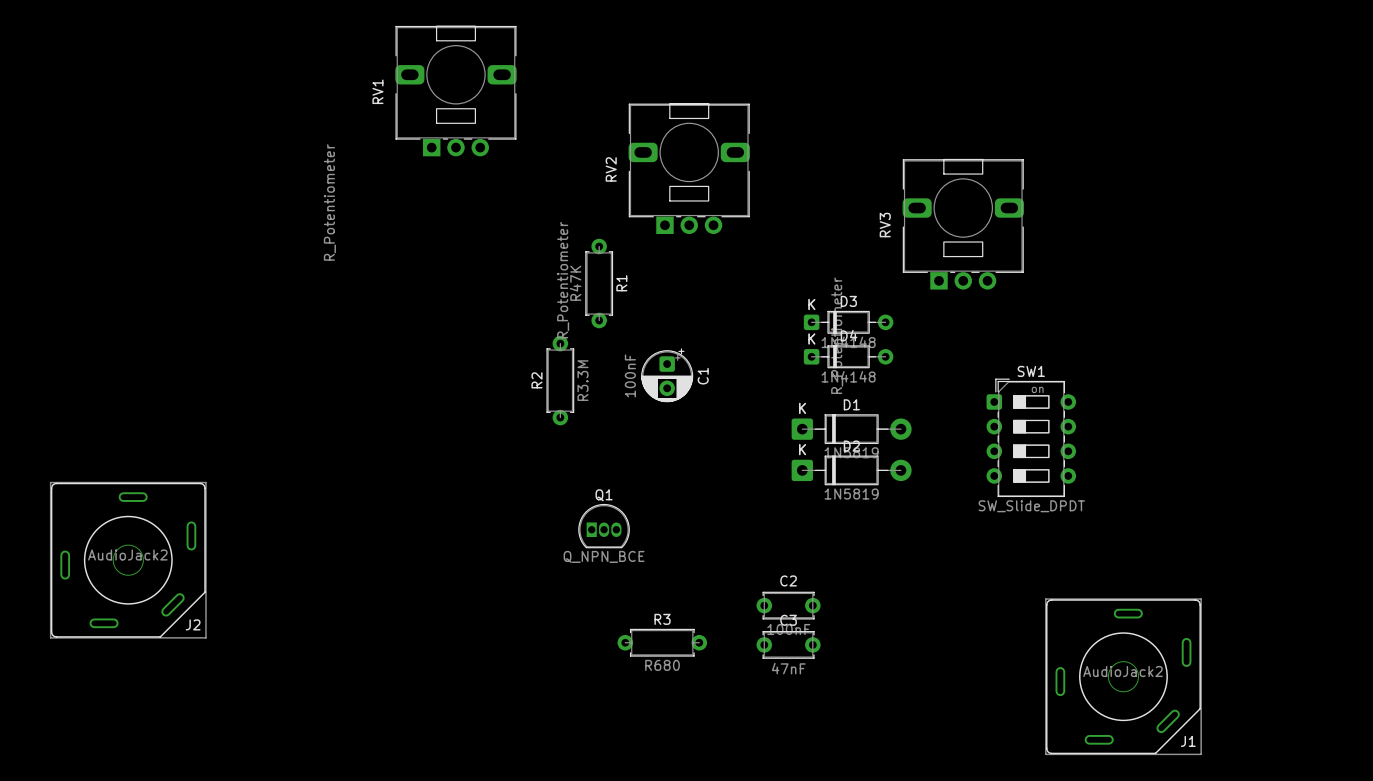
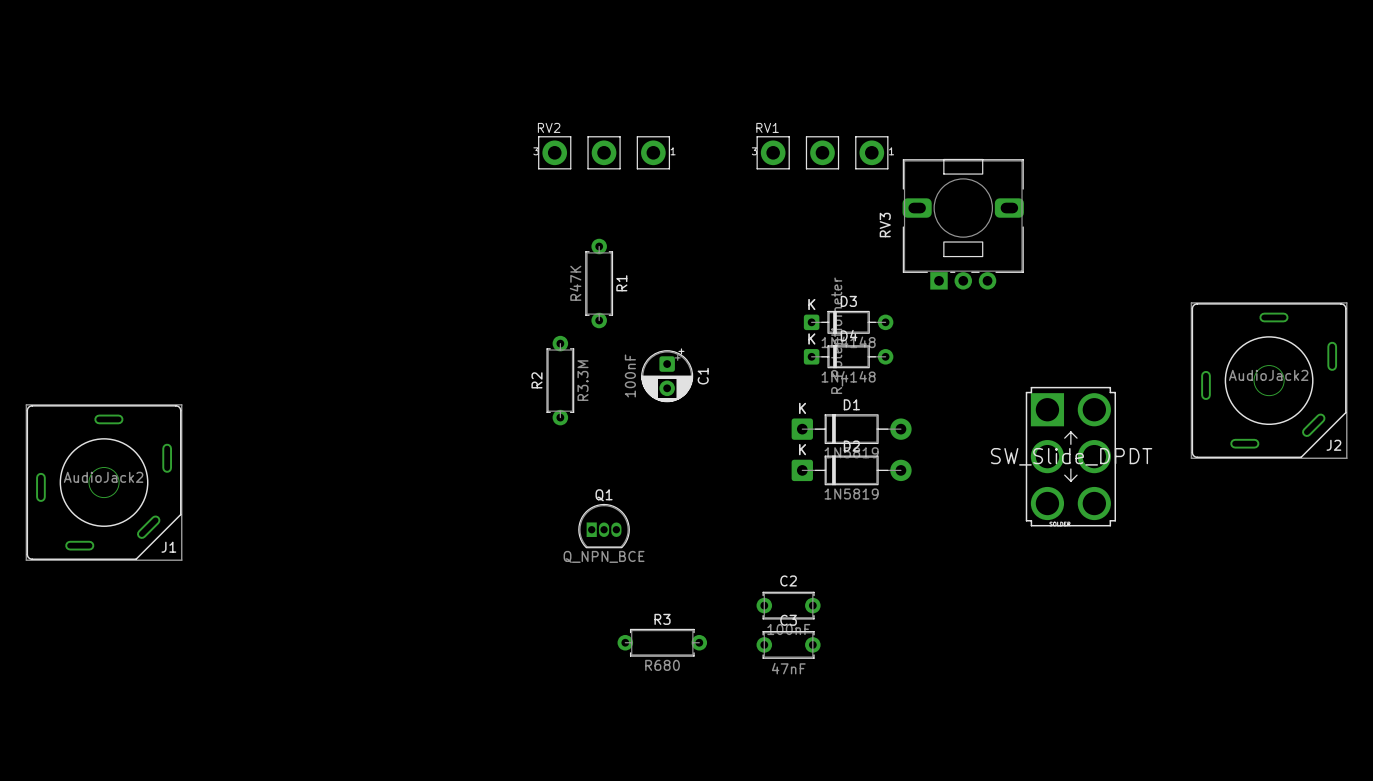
RV1 footprint: [395, 25, 517, 157] -> [756, 136, 889, 170]
RV1 name position: RV1 (377, 91) -> RV1 (767, 127)
RV2 footprint: [628, 103, 750, 234] -> [538, 136, 671, 170]
RV2 name position: RV2 (611, 169) -> RV2 (549, 127)
RV1 value: R_Potentiometer (329, 202) -> none
RV2 value: R_Potentiometer (563, 280) -> none
SW1: SW_Slide_DPDT (1031, 437) -> none
part: none -> SW_Slide_DPDT (1070, 456)
J2 position: (128, 560) -> (1269, 380)
J1 position: (1123, 676) -> (104, 482)

